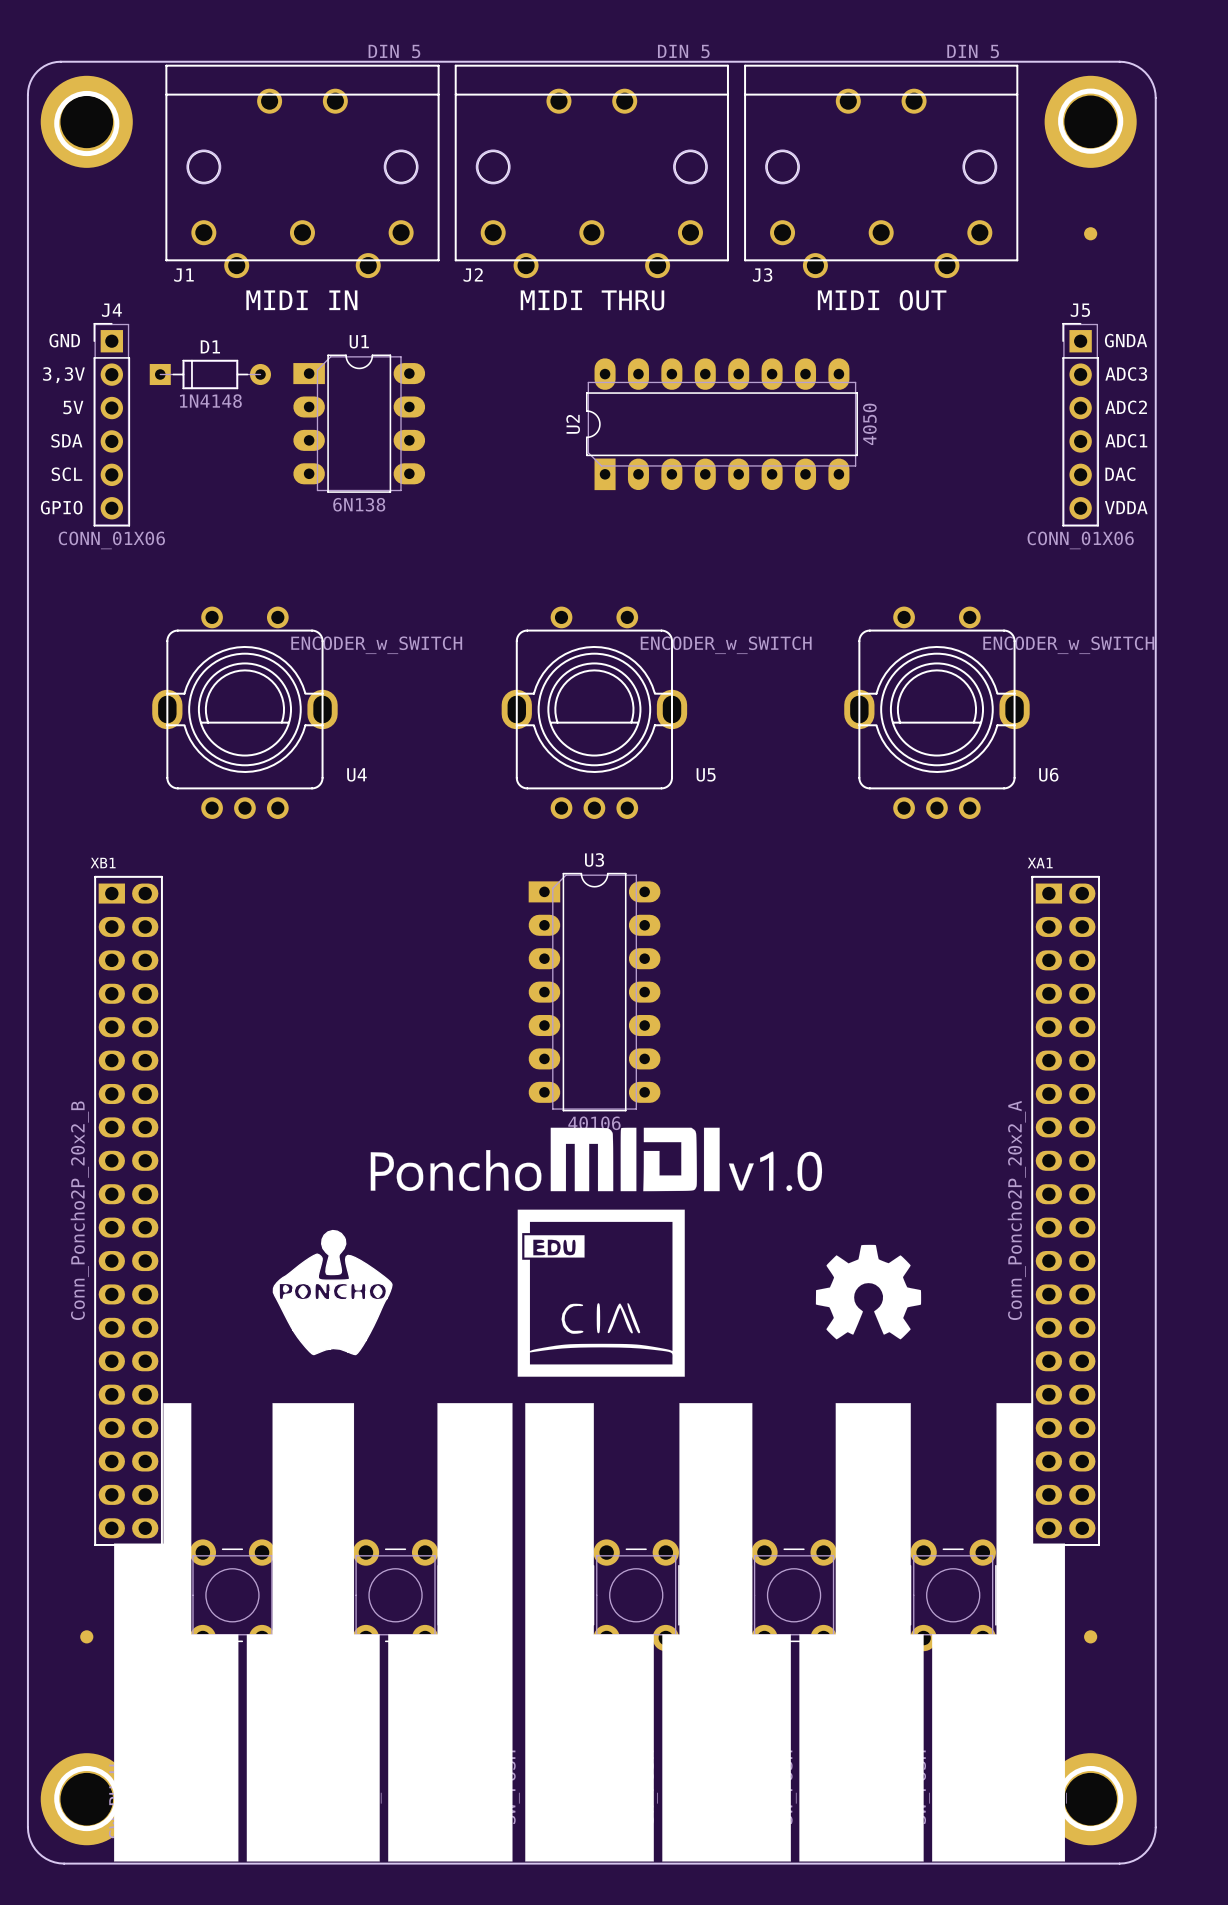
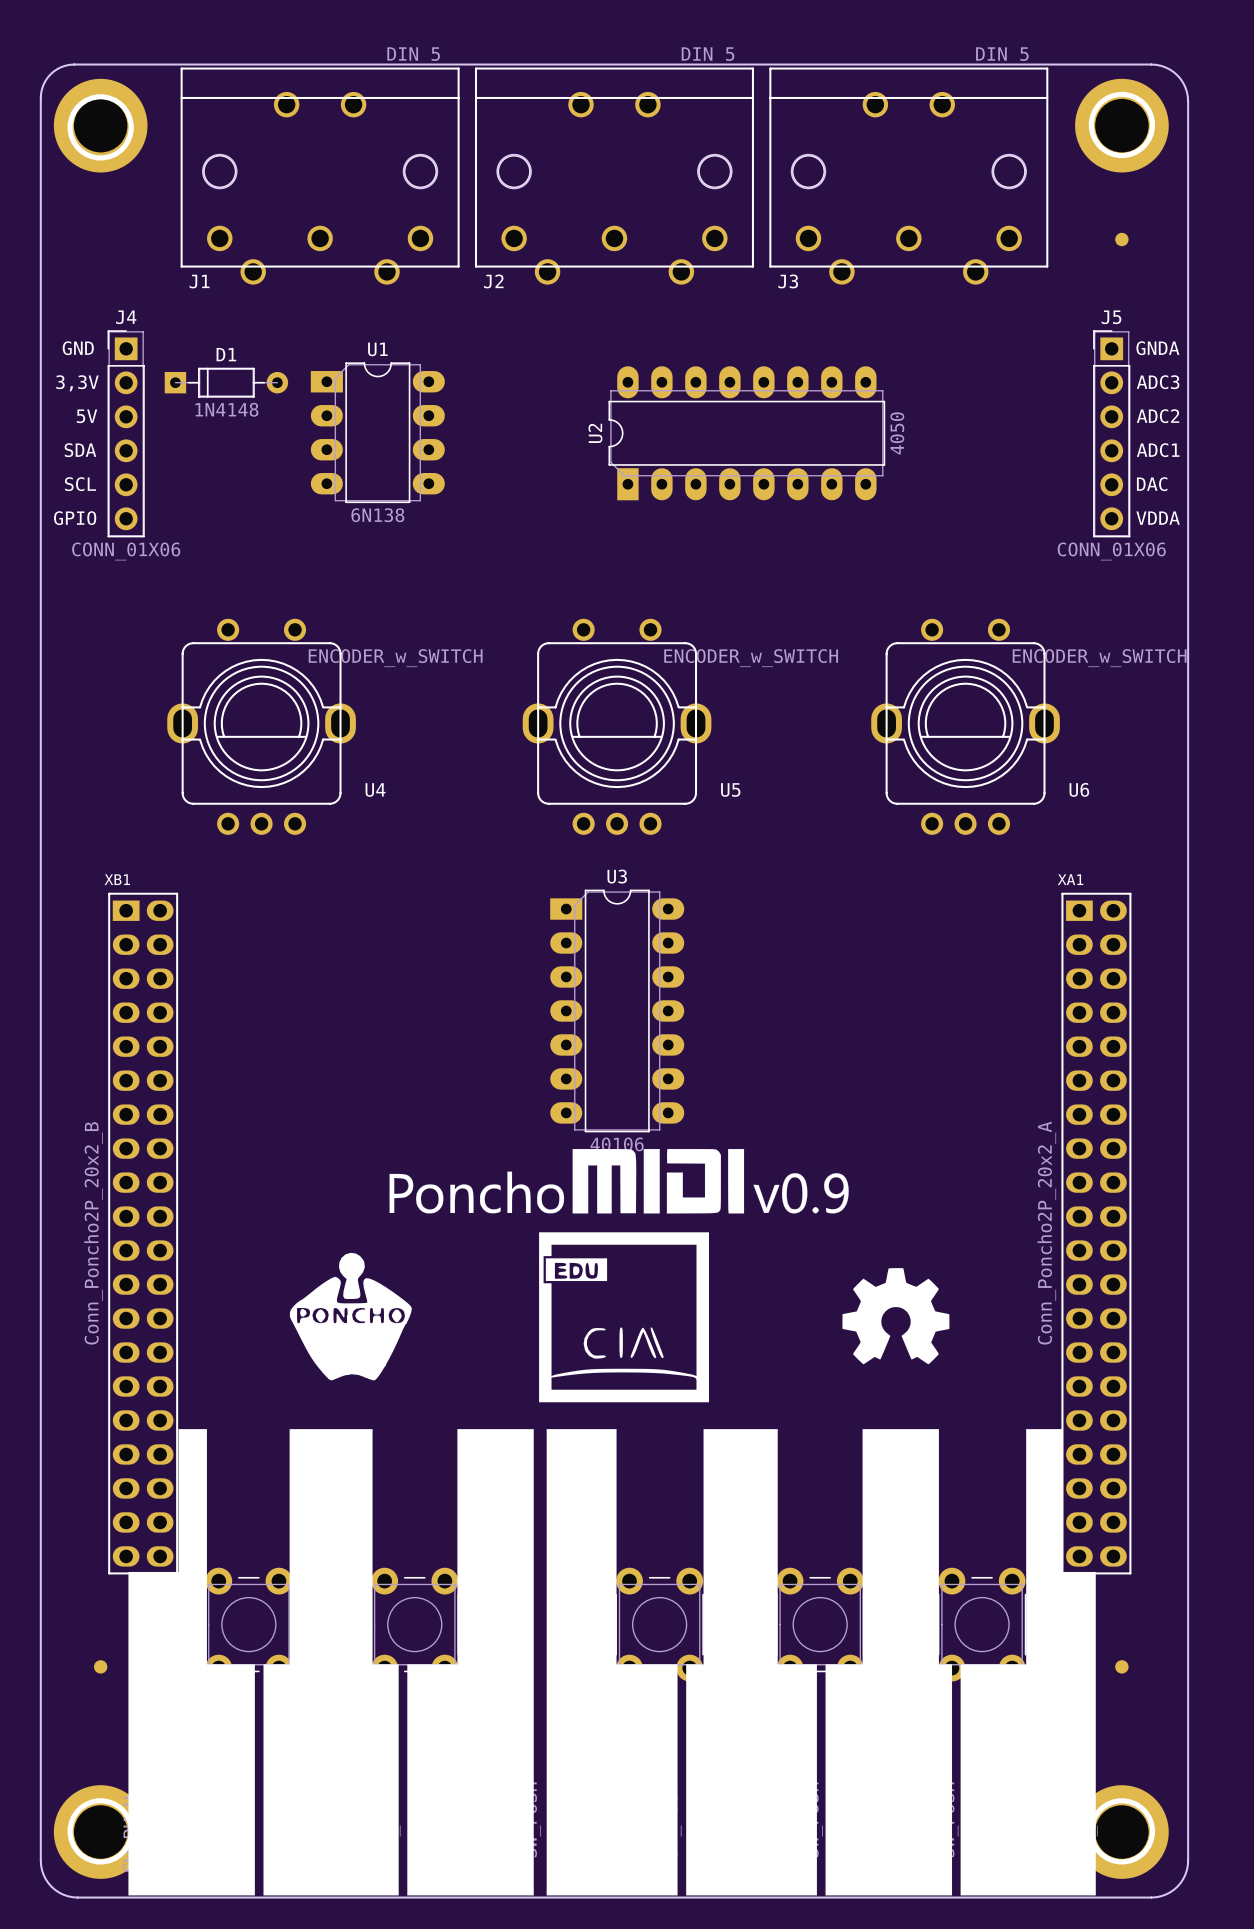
text: MIDI IN (301, 300) -> none
text: MIDI THRU (592, 300) -> none
text: MIDI OUT (882, 300) -> none
drawing shape: [370, 1127, 823, 1192] -> [389, 1148, 849, 1214]

